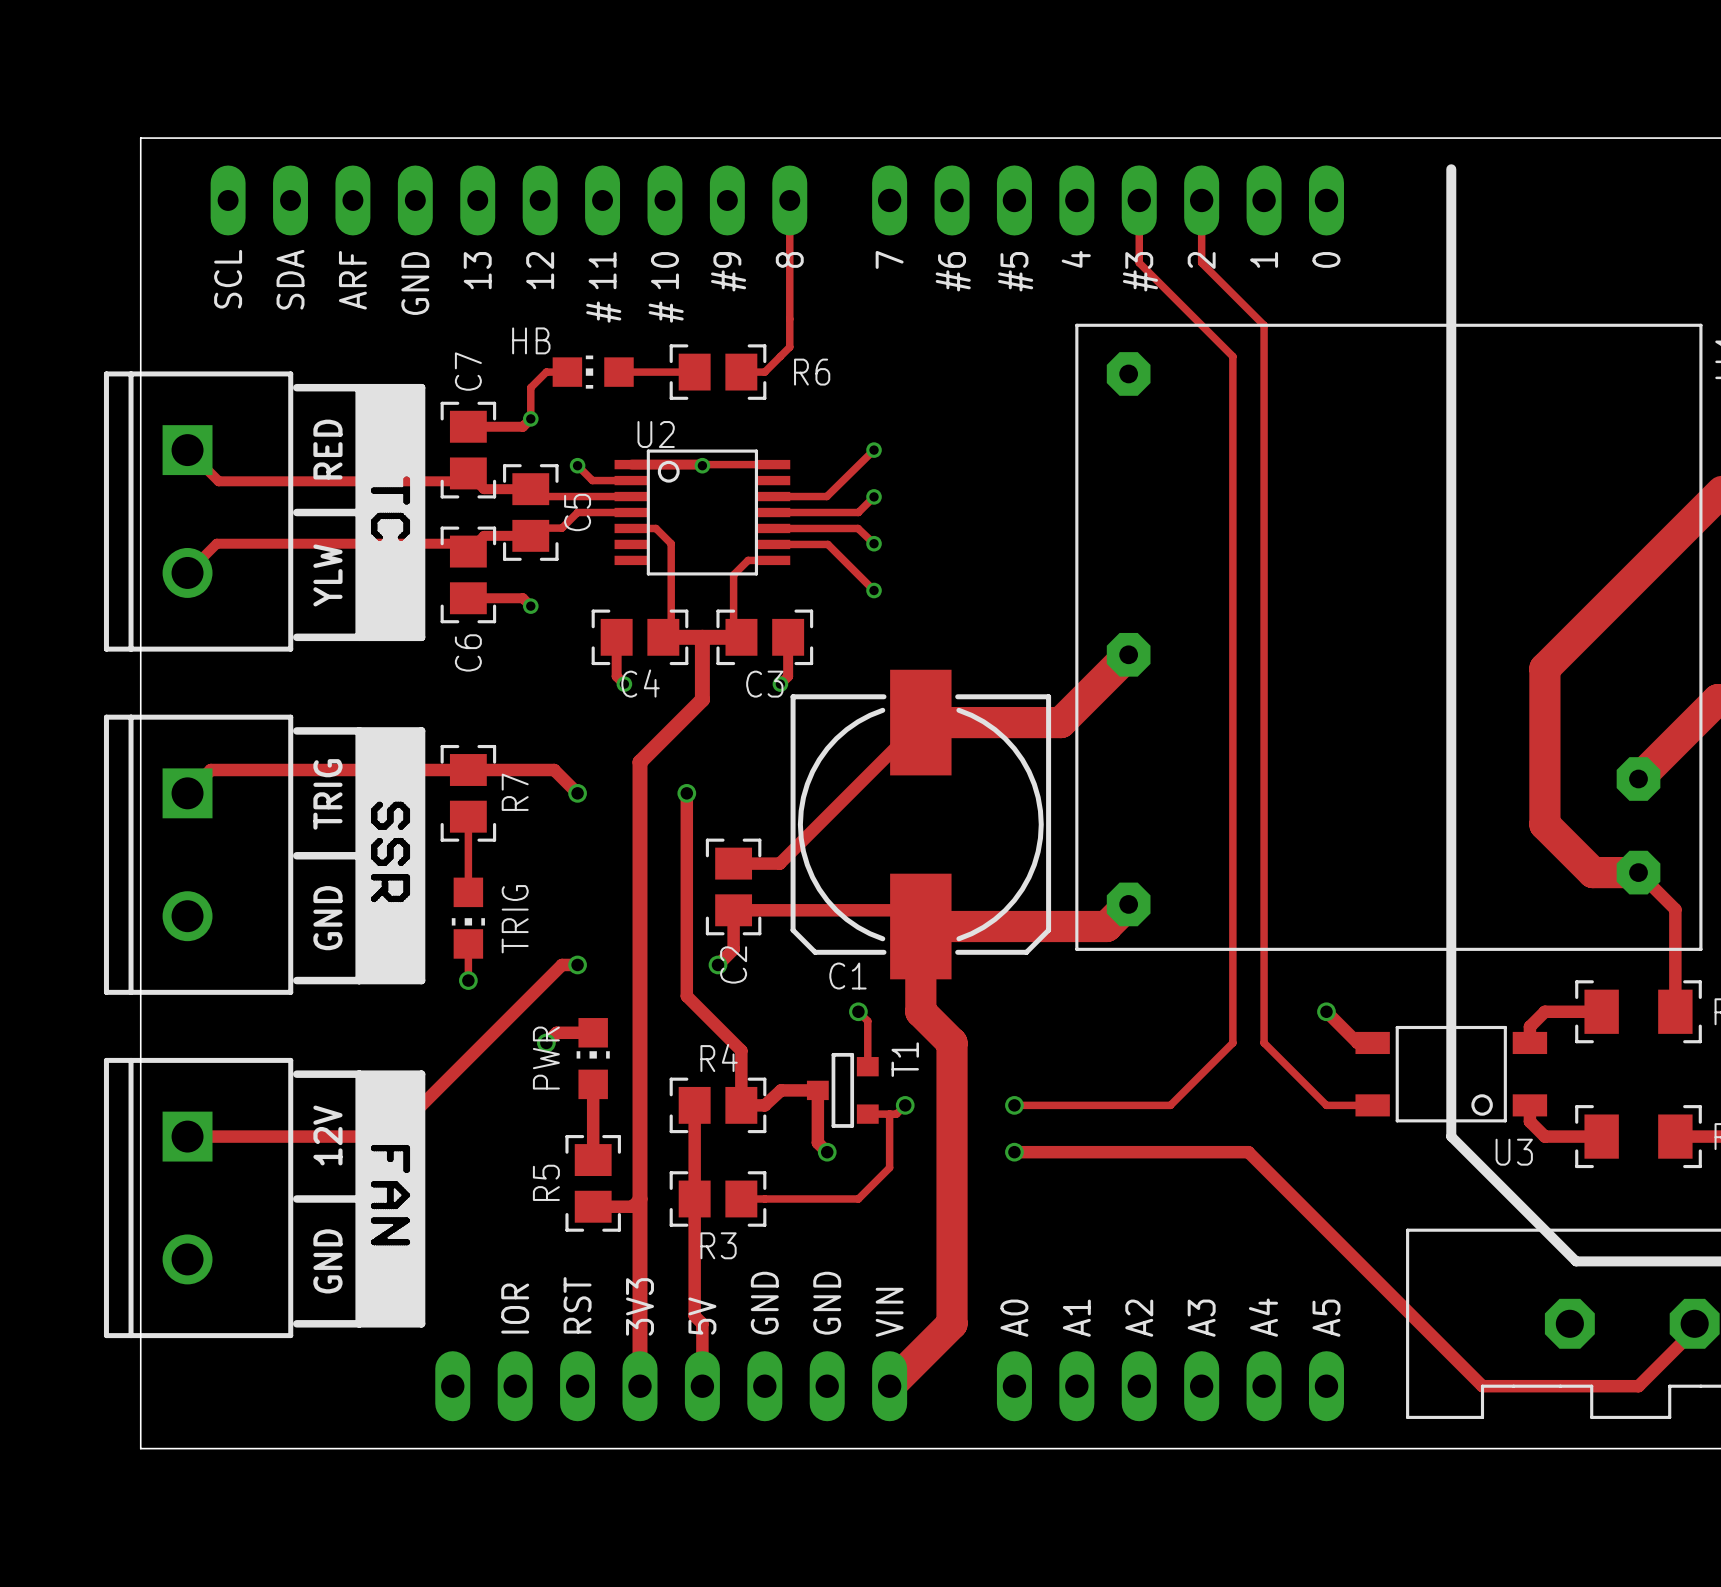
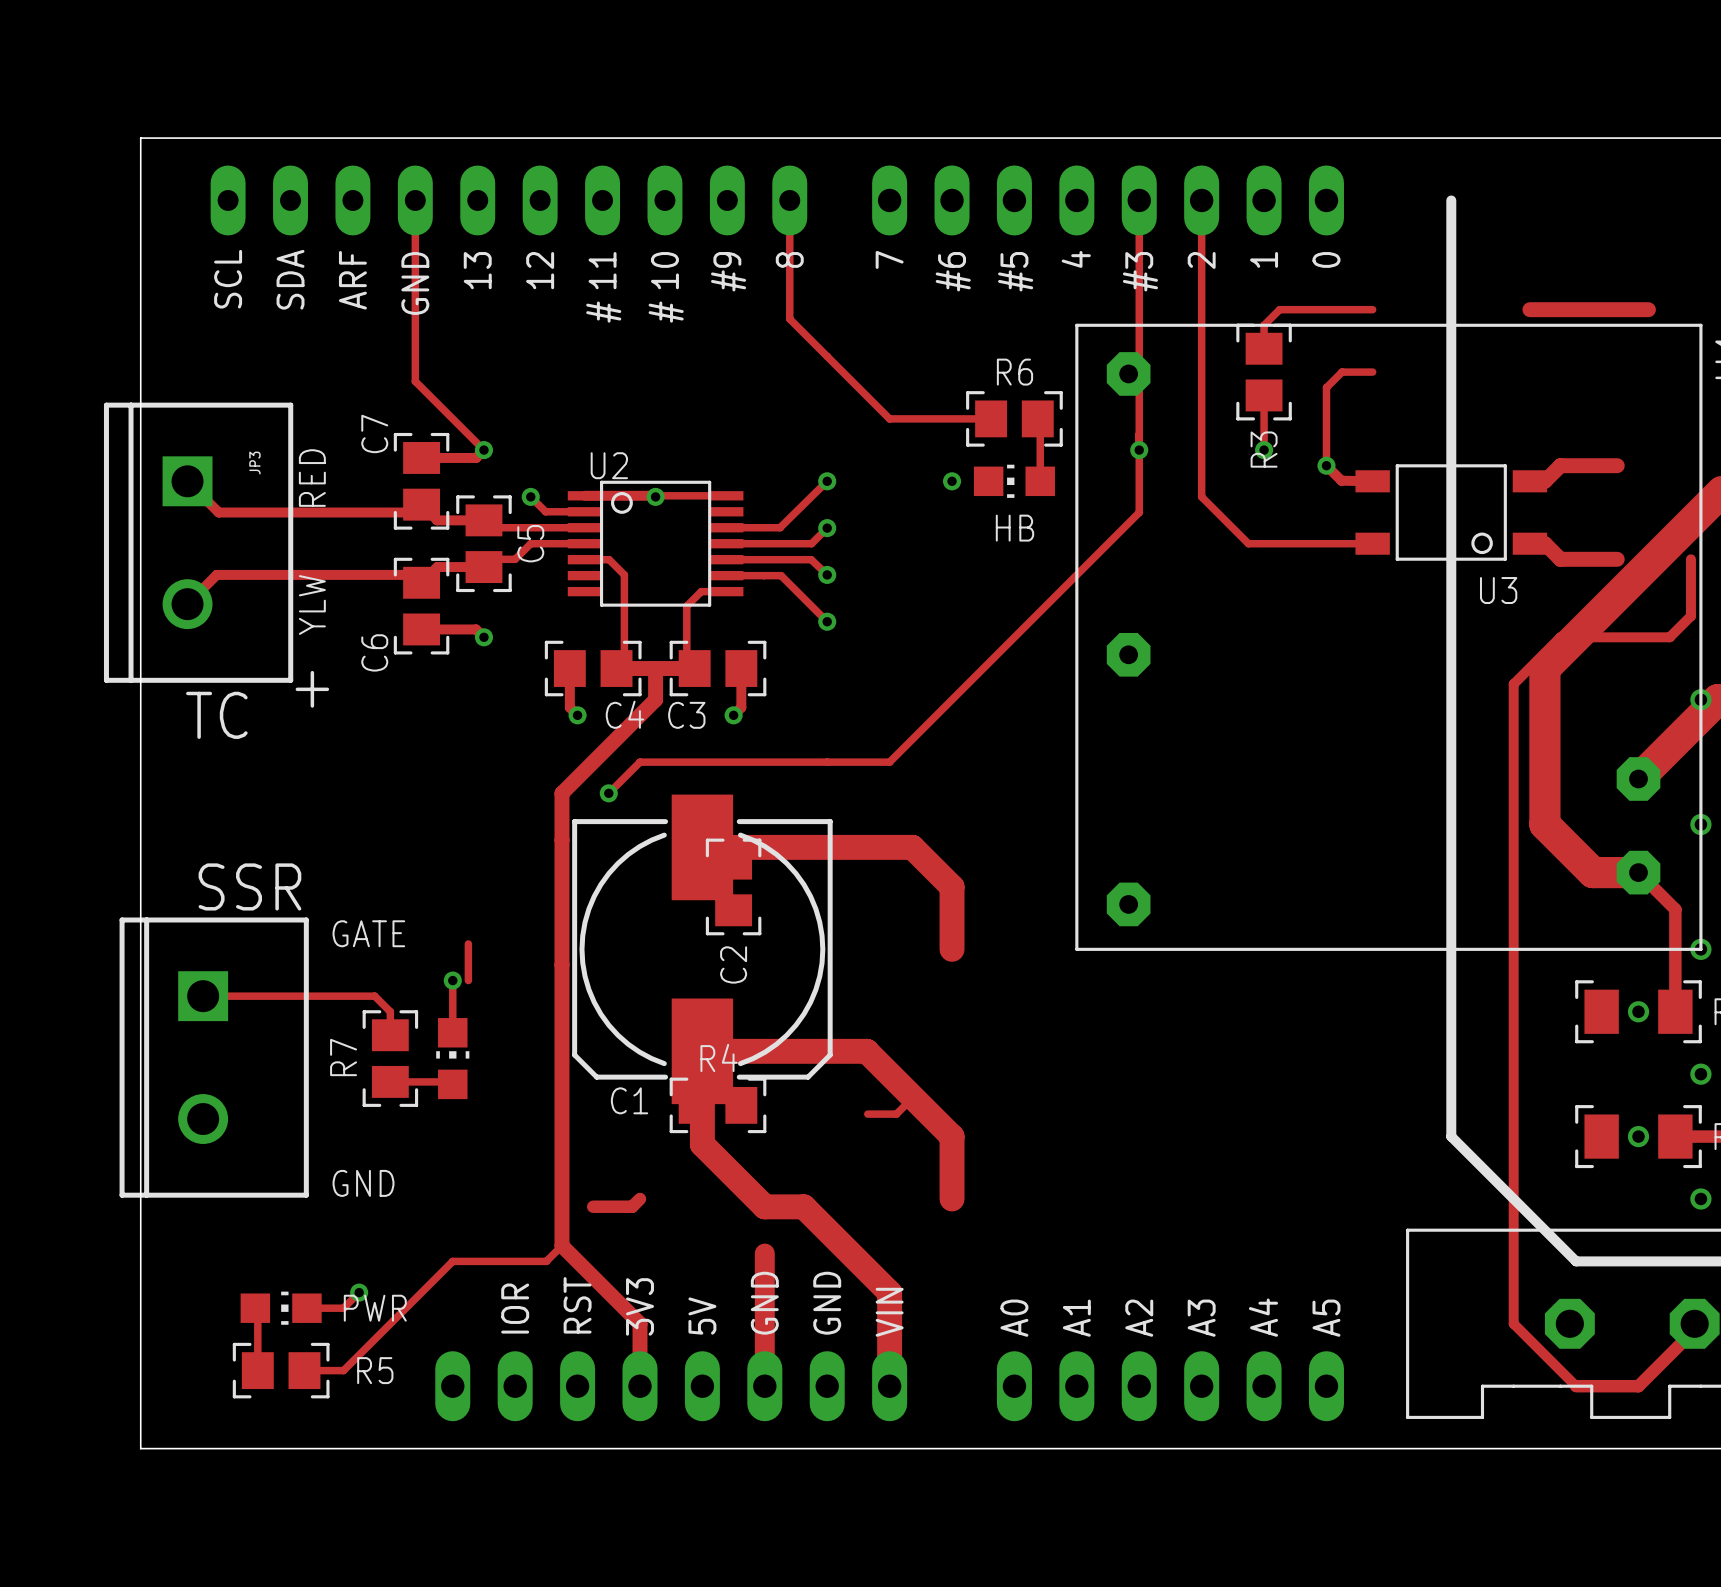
line: (1451, 169) (1451, 200) -> none
track: none -> (415, 200) (415, 381) (483, 450) (476, 457) (421, 457)
track: (1139, 262) (1232, 356) (1232, 1042) (1170, 1105) (1014, 1105) -> (1139, 262) (1139, 512) (889, 762) (639, 762) (608, 793)
track: (1201, 262) (1264, 325) -> (1372, 309) (1279, 309) (1264, 325)
track: none -> (1201, 262) (1201, 496) (1248, 543) (1372, 543)
track: none -> (1529, 309) (1648, 309)
track: (789, 319) (789, 347) (764, 372) (741, 372) -> (789, 319) (889, 418) (991, 418)
part text position: HB (531, 340) -> HB (1014, 528)
track: (1264, 348) (1264, 395) -> none
C7 name position: C7 (468, 371) -> C7 (374, 433)
track: (567, 372) (546, 372) (530, 387) (530, 418) (522, 426) (468, 426) -> none
part position: (593, 372) -> (1014, 481)
track: (618, 372) (694, 372) -> none
R6 position: (718, 372) -> (1014, 418)
R6 name position: R6 (812, 372) -> R6 (1014, 372)
track: none -> (1372, 372) (1342, 372) (1326, 387) (1326, 465) (1341, 480) (1372, 481)
drawing: [293, 383, 426, 642] -> none
via: (530, 418) -> none
track: none -> (1037, 418) (1040, 421) (1040, 481)
track: (187, 450) (218, 481) (460, 481) (468, 473) (484, 489) (530, 489) (538, 496) (631, 496) -> none
C7 position: (468, 450) -> (421, 481)
via: none -> (483, 450)
track: (874, 450) (826, 496) (773, 496) -> (827, 481) (780, 527) (726, 527)
via: (874, 450) -> none
via: none -> (1139, 450)
track: (1264, 450) (1264, 1042) (1326, 1105) (1372, 1105) -> none
via: none -> (1264, 450)
track: (631, 464) (701, 464) -> (584, 495) (654, 495)
track: (701, 464) (773, 464) -> (654, 495) (726, 495)
track: (577, 465) (592, 480) (631, 480) -> (530, 496) (545, 511) (584, 511)
via: (577, 465) -> none
via: (702, 465) -> none
via: none -> (1326, 465)
track: none -> (1617, 465) (1560, 465) (1544, 481) (1529, 481)
text: none -> RED (312, 478)
track: none -> (187, 481) (218, 512) (413, 512) (421, 504) (437, 520) (483, 520) (491, 527) (584, 527)
via: none -> (827, 481)
via: none -> (952, 481)
via: none -> (530, 496)
via: none -> (655, 496)
track: (874, 496) (858, 512) (773, 512) -> (827, 528) (811, 543) (726, 543)
via: (874, 496) -> none
part: (198, 511) -> none
C5 position: (530, 512) -> (483, 543)
track: (631, 512) (577, 512) (561, 528) (538, 528) (530, 535) (484, 535) (468, 551) (460, 543) (216, 543) (187, 572) -> none
U2 position: (702, 512) -> (655, 543)
track: (631, 528) (655, 528) (671, 543) (671, 629) (663, 637) (741, 637) (733, 629) (733, 574) (748, 560) (773, 560) -> (584, 559) (609, 559) (624, 574) (624, 660) (616, 668) (694, 668) (686, 660) (686, 606) (701, 591) (726, 591)
track: (773, 528) (858, 528) (874, 543) -> (726, 559) (811, 559) (827, 574)
via: none -> (827, 528)
JP3: none -> (198, 542)
track: none -> (584, 543) (530, 543) (515, 559) (491, 559) (483, 567) (437, 567) (421, 582) (413, 574) (216, 574) (187, 604)
via: (874, 543) -> none
track: none -> (1529, 543) (1544, 543) (1560, 559) (1617, 559)
track: (773, 544) (827, 544) (874, 590) -> (726, 575) (781, 575) (827, 621)
C6 position: (468, 574) -> (421, 606)
via: none -> (827, 574)
via: (874, 590) -> none
track: (468, 598) (522, 598) (530, 606) -> (421, 629) (476, 629) (483, 637)
text: none -> YLW (312, 604)
via: (530, 606) -> none
via: none -> (827, 621)
via: none -> (483, 637)
track: (616, 637) (616, 676) (624, 684) -> (569, 668) (569, 707) (577, 715)
C4 position: (639, 637) -> (593, 668)
track: (702, 637) (702, 699) (639, 762) (639, 1323) -> (561, 1245) (639, 1323)
C3 position: (764, 637) -> (718, 668)
track: (788, 637) (788, 676) (780, 684) -> (741, 668) (741, 707) (733, 715)
C6 name position: C6 (468, 652) -> C6 (374, 652)
track: (1128, 654) (1060, 722) (920, 722) (779, 863) (733, 863) -> none
track: none -> (655, 668) (655, 699) (561, 793) (561, 1245)
C4 name position: C4 (640, 683) -> C4 (624, 714)
via: (624, 684) -> none
C3 name position: C3 (764, 684) -> C3 (686, 715)
via: (780, 684) -> none
text: none -> + (312, 689)
via: none -> (1700, 699)
text: none -> TC (216, 715)
via: none -> (577, 715)
via: none -> (733, 715)
drawing: [293, 727, 426, 985] -> none
R7 name position: R7 (515, 792) -> R7 (343, 1057)
track: (187, 793) (210, 770) (554, 770) (577, 793) -> none
R7 position: (468, 793) -> (390, 1058)
via: (577, 793) -> none
via: none -> (608, 793)
track: (686, 793) (686, 996) (741, 1050) (741, 1105) (764, 1105) (781, 1090) (817, 1090) (817, 1142) (827, 1152) -> none
via: (686, 793) -> none
track: (468, 816) (468, 892) -> none
C1 position: (920, 824) -> (702, 949)
via: none -> (1700, 824)
track: none -> (702, 847) (912, 847) (952, 886) (952, 949)
part: (198, 854) -> none
text: none -> SSR (249, 886)
track: (1128, 904) (1106, 926) (920, 926) -> none
part: (468, 918) -> none
track: (920, 926) (920, 1011) (952, 1042) (952, 1136) -> none
track: (920, 926) (904, 910) (733, 910) (733, 949) (718, 964) -> none
text: none -> GATE (368, 933)
via: none -> (1700, 949)
track: (577, 964) (561, 964) (390, 1136) (187, 1136) -> none
via: (577, 964) -> none
via: (718, 964) -> none
track: none -> (452, 980) (452, 1032)
via position: (468, 980) -> (452, 980)
track: none -> (203, 996) (374, 996) (390, 1011) (390, 1035)
track: (858, 1011) (867, 1021) (867, 1066) -> none
via: (858, 1011) -> none
track: (1326, 1011) (1357, 1042) (1372, 1042) -> none
via: (1326, 1011) -> none
track: (1601, 1011) (1544, 1011) (1529, 1026) (1529, 1042) -> none
via: none -> (1638, 1011)
track: (593, 1032) (556, 1032) (546, 1042) -> none
via: (546, 1042) -> none
part: none -> (214, 1057)
part: none -> (452, 1058)
part text position: PWR (546, 1058) -> PWR (375, 1308)
part rotation: 0° (593, 1058) -> 90° clockwise (281, 1308)
part position: (593, 1058) -> (281, 1308)
drawing: [293, 1070, 426, 1328] -> none
U3 position: (1451, 1074) -> (1451, 512)
via: none -> (1700, 1074)
track: none -> (390, 1081) (450, 1081) (452, 1084)
track: (593, 1084) (593, 1160) -> none
T1: (842, 1090) -> none
track: (694, 1105) (694, 1316) (702, 1323) (702, 1386) -> none
via: (905, 1105) -> none
via: (1014, 1105) -> none
track: (1529, 1105) (1529, 1121) (1544, 1136) (1601, 1136) -> none
track: (889, 1114) (889, 1167) (858, 1198) (741, 1198) -> none
track width: thick (952, 1136) (952, 1198) -> thin (952, 1136) (952, 1198)
via: none -> (1638, 1136)
via: (827, 1152) -> none
track: (1014, 1152) (1248, 1152) (1482, 1386) (1576, 1386) -> (1690, 559) (1690, 616) (1669, 637) (1560, 637) (1513, 684) (1513, 1323) (1576, 1386)
via: (1014, 1152) -> none
U3 name position: U3 (1514, 1152) -> U3 (1498, 590)
R5 name position: R5 (546, 1182) -> R5 (375, 1370)
text: none -> GND (363, 1183)
R5 rotation: 0° (593, 1183) -> 90° clockwise (281, 1370)
R5 position: (593, 1183) -> (281, 1370)
part: (198, 1198) -> none
R3 rotation: 0° (718, 1198) -> 90° clockwise (1264, 372)
R3 position: (718, 1198) -> (1264, 372)
track: (952, 1198) (952, 1323) (889, 1386) -> (952, 1136) (866, 1051) (702, 1051) (702, 1144) (764, 1206) (803, 1206) (889, 1292) (889, 1386)
via: none -> (1700, 1198)
track: none -> (561, 1245) (546, 1261) (452, 1261) (343, 1370) (304, 1370)
track: none -> (764, 1253) (764, 1386)
track: none -> (359, 1292) (343, 1308) (306, 1308)
via: none -> (359, 1292)
track: none -> (255, 1308) (257, 1310) (257, 1370)

